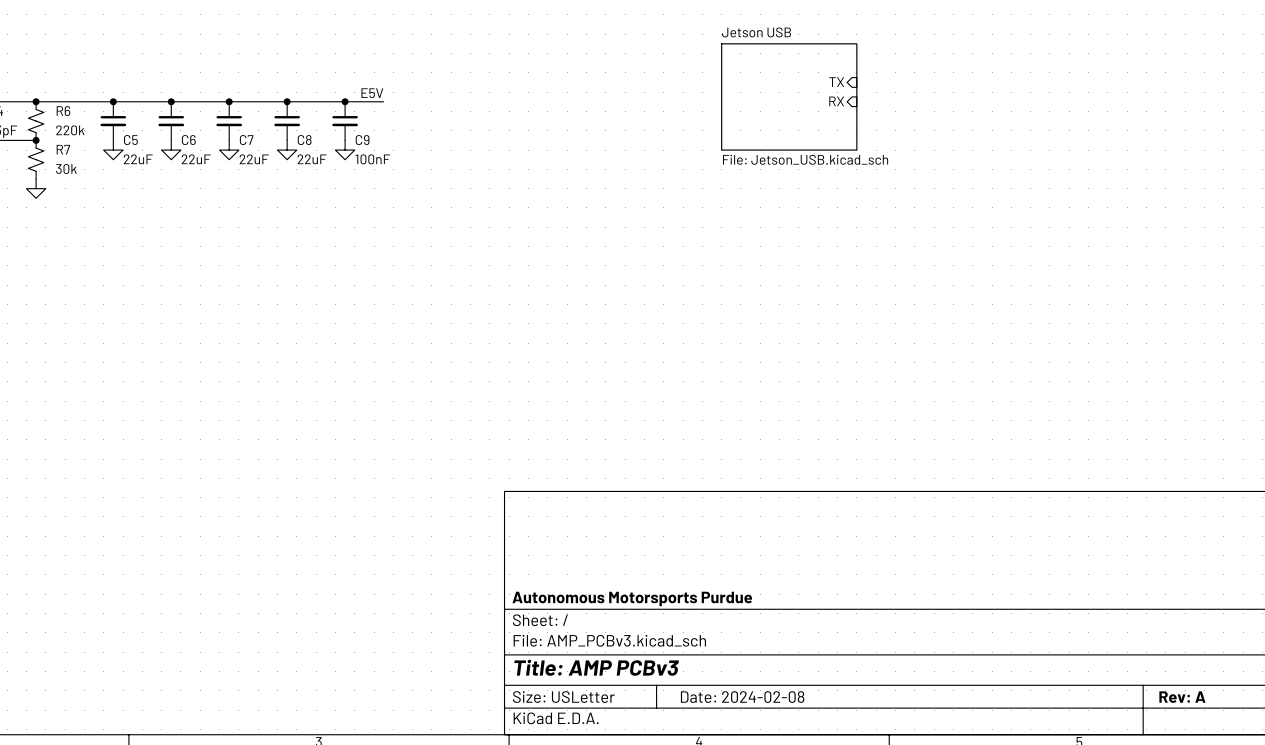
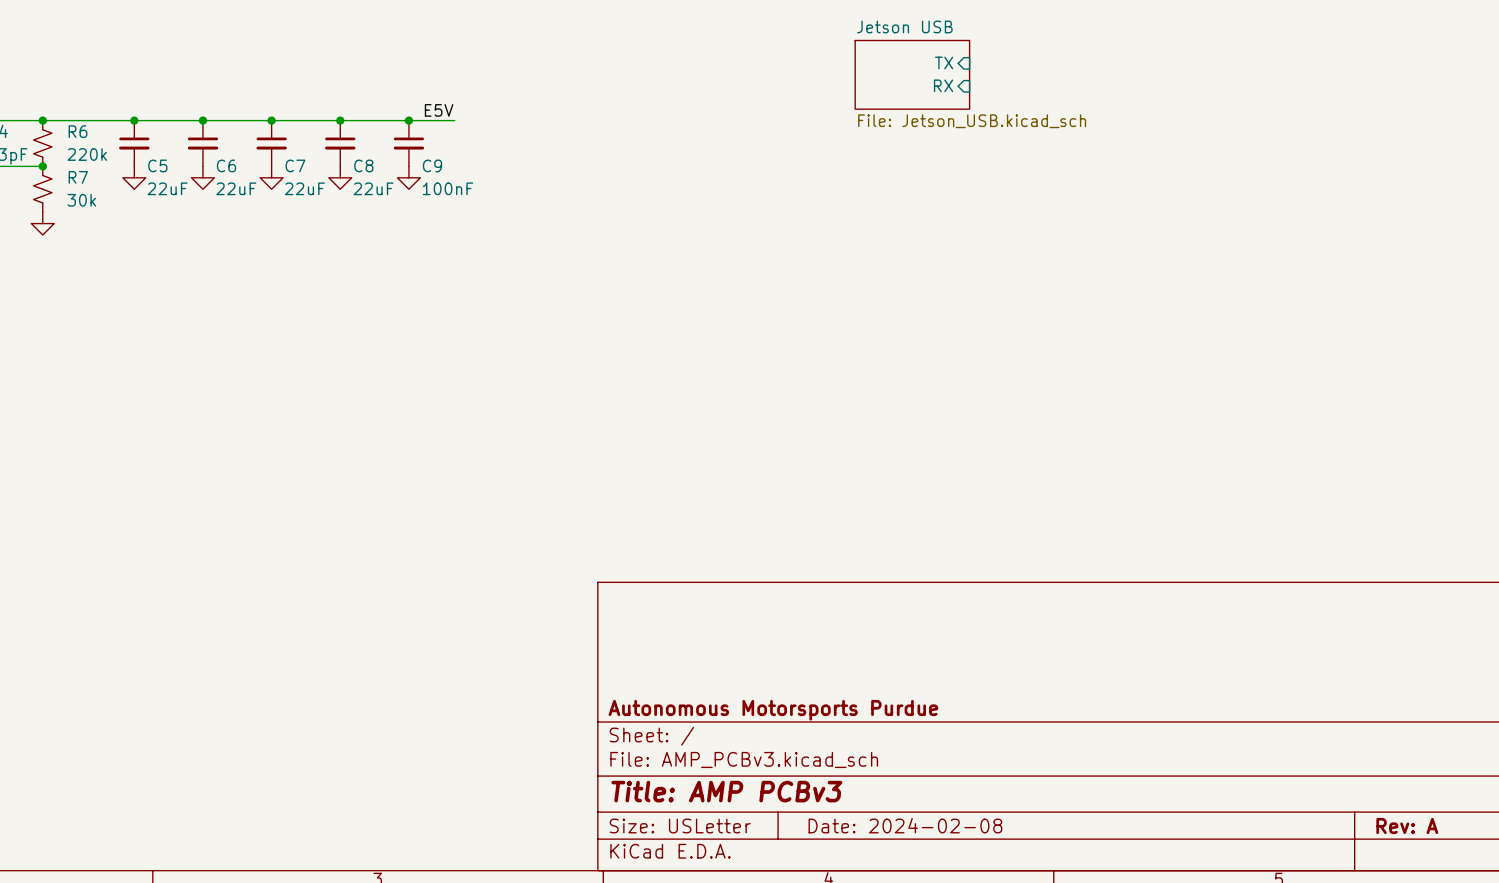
sheet Jetson USB: none -> File: Jetson_USB.kicad_sch (912, 74)
sheet pin position: TX (836, 82) -> TX (944, 62)
sheet Jetson USB: File: Jetson_USB.kicad_sch (789, 96) -> none
sheet pin position: RX (836, 101) -> RX (943, 85)

